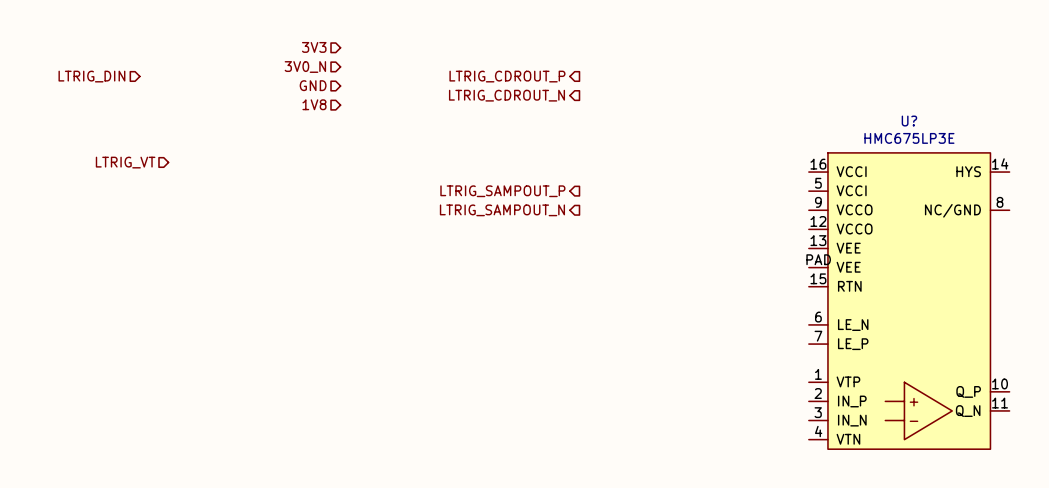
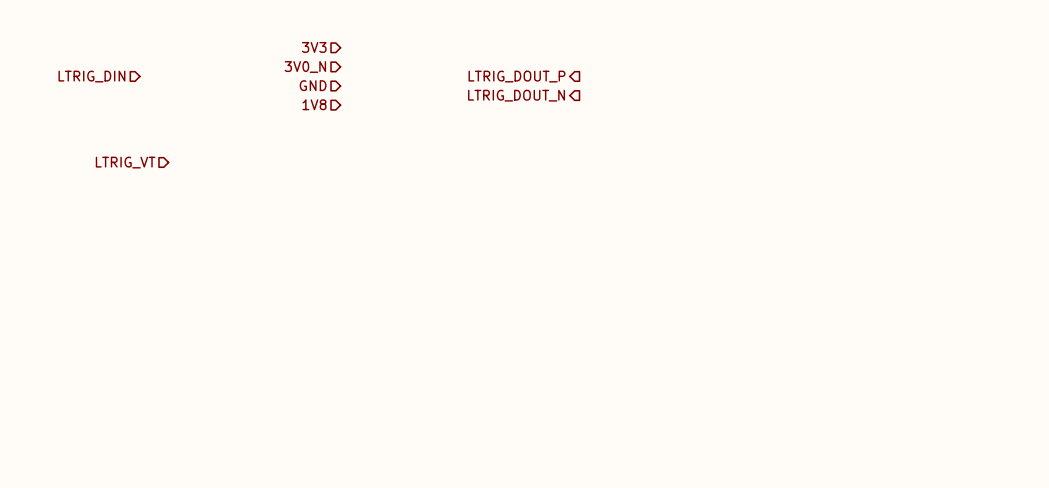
hierarchical label: LTRIG_CDROUT_P (507, 76) -> LTRIG_DOUT_P (517, 76)
hierarchical label: LTRIG_CDROUT_N (506, 95) -> LTRIG_DOUT_N (516, 95)
hierarchical label: LTRIG_SAMPOUT_P (502, 191) -> none
hierarchical label: LTRIG_SAMPOUT_N (502, 210) -> none
U?: HMC675LP3E (909, 301) -> none

